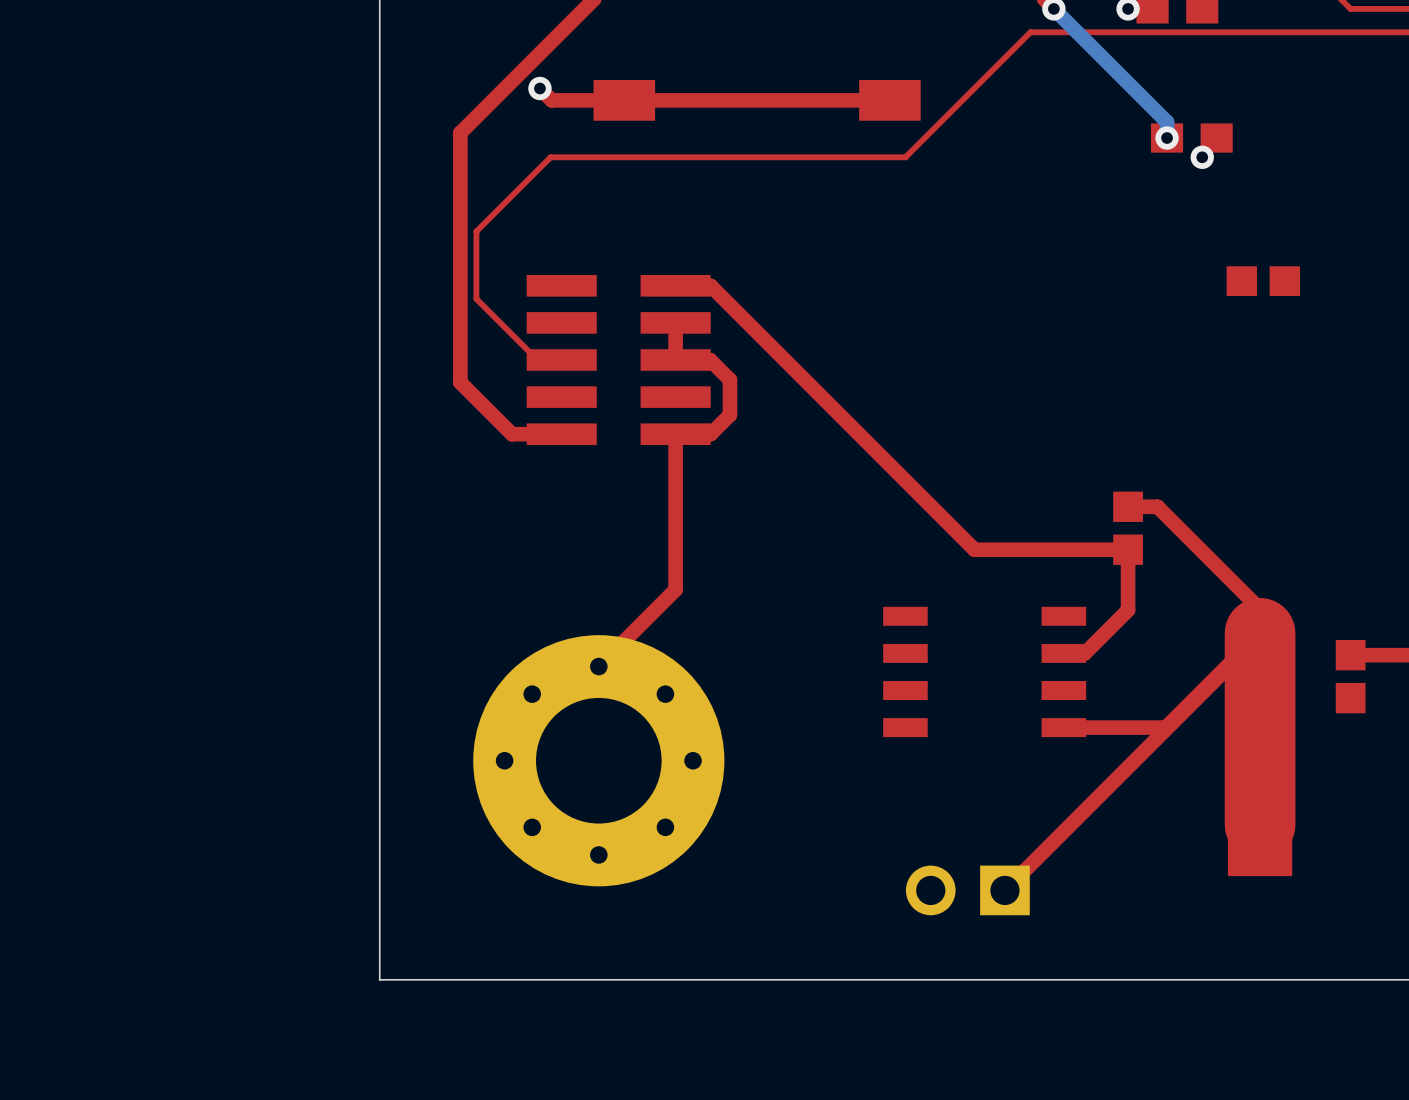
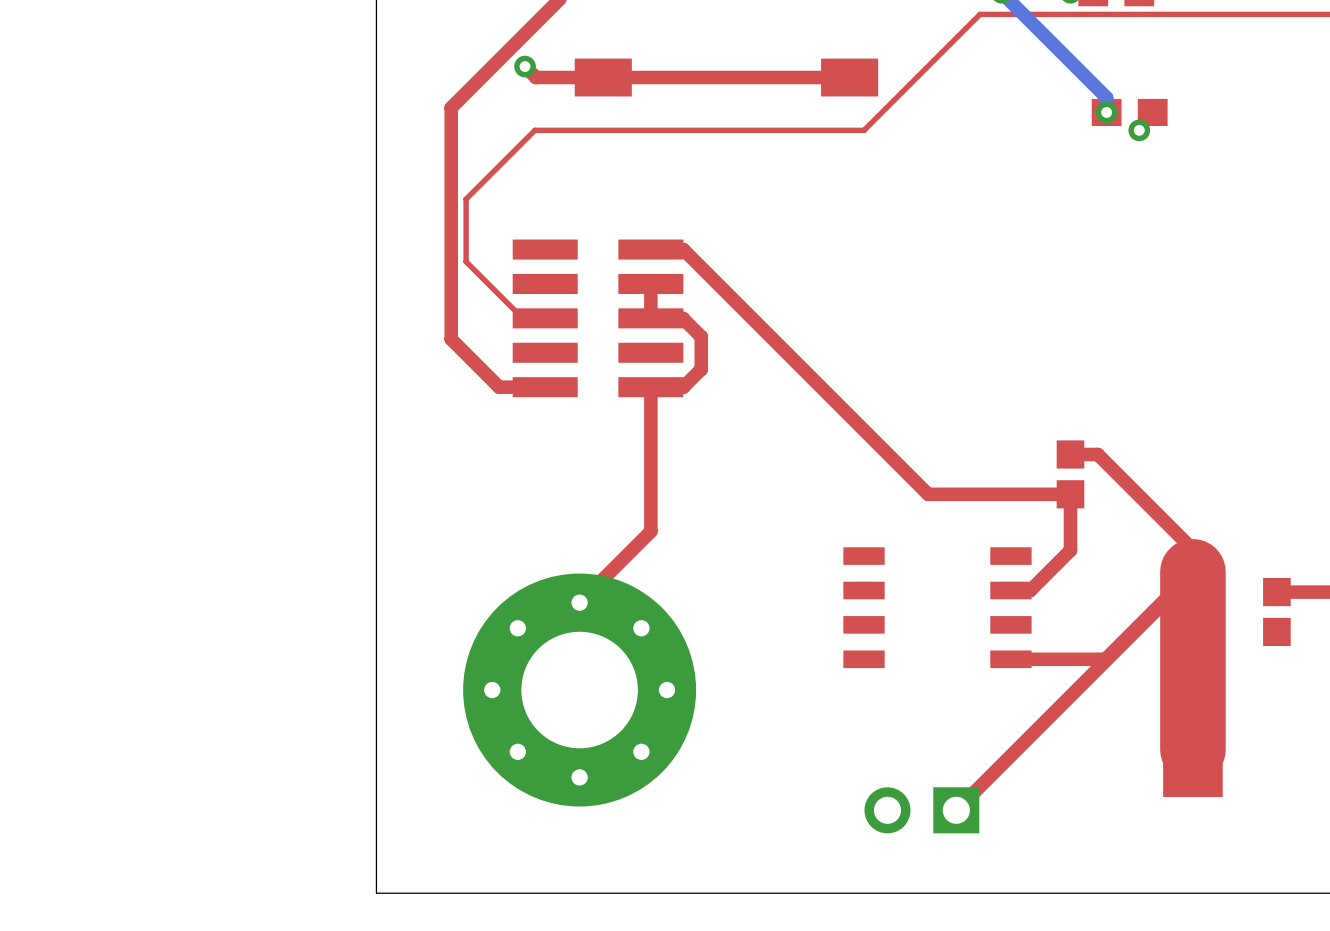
part: (1263, 281) -> none

